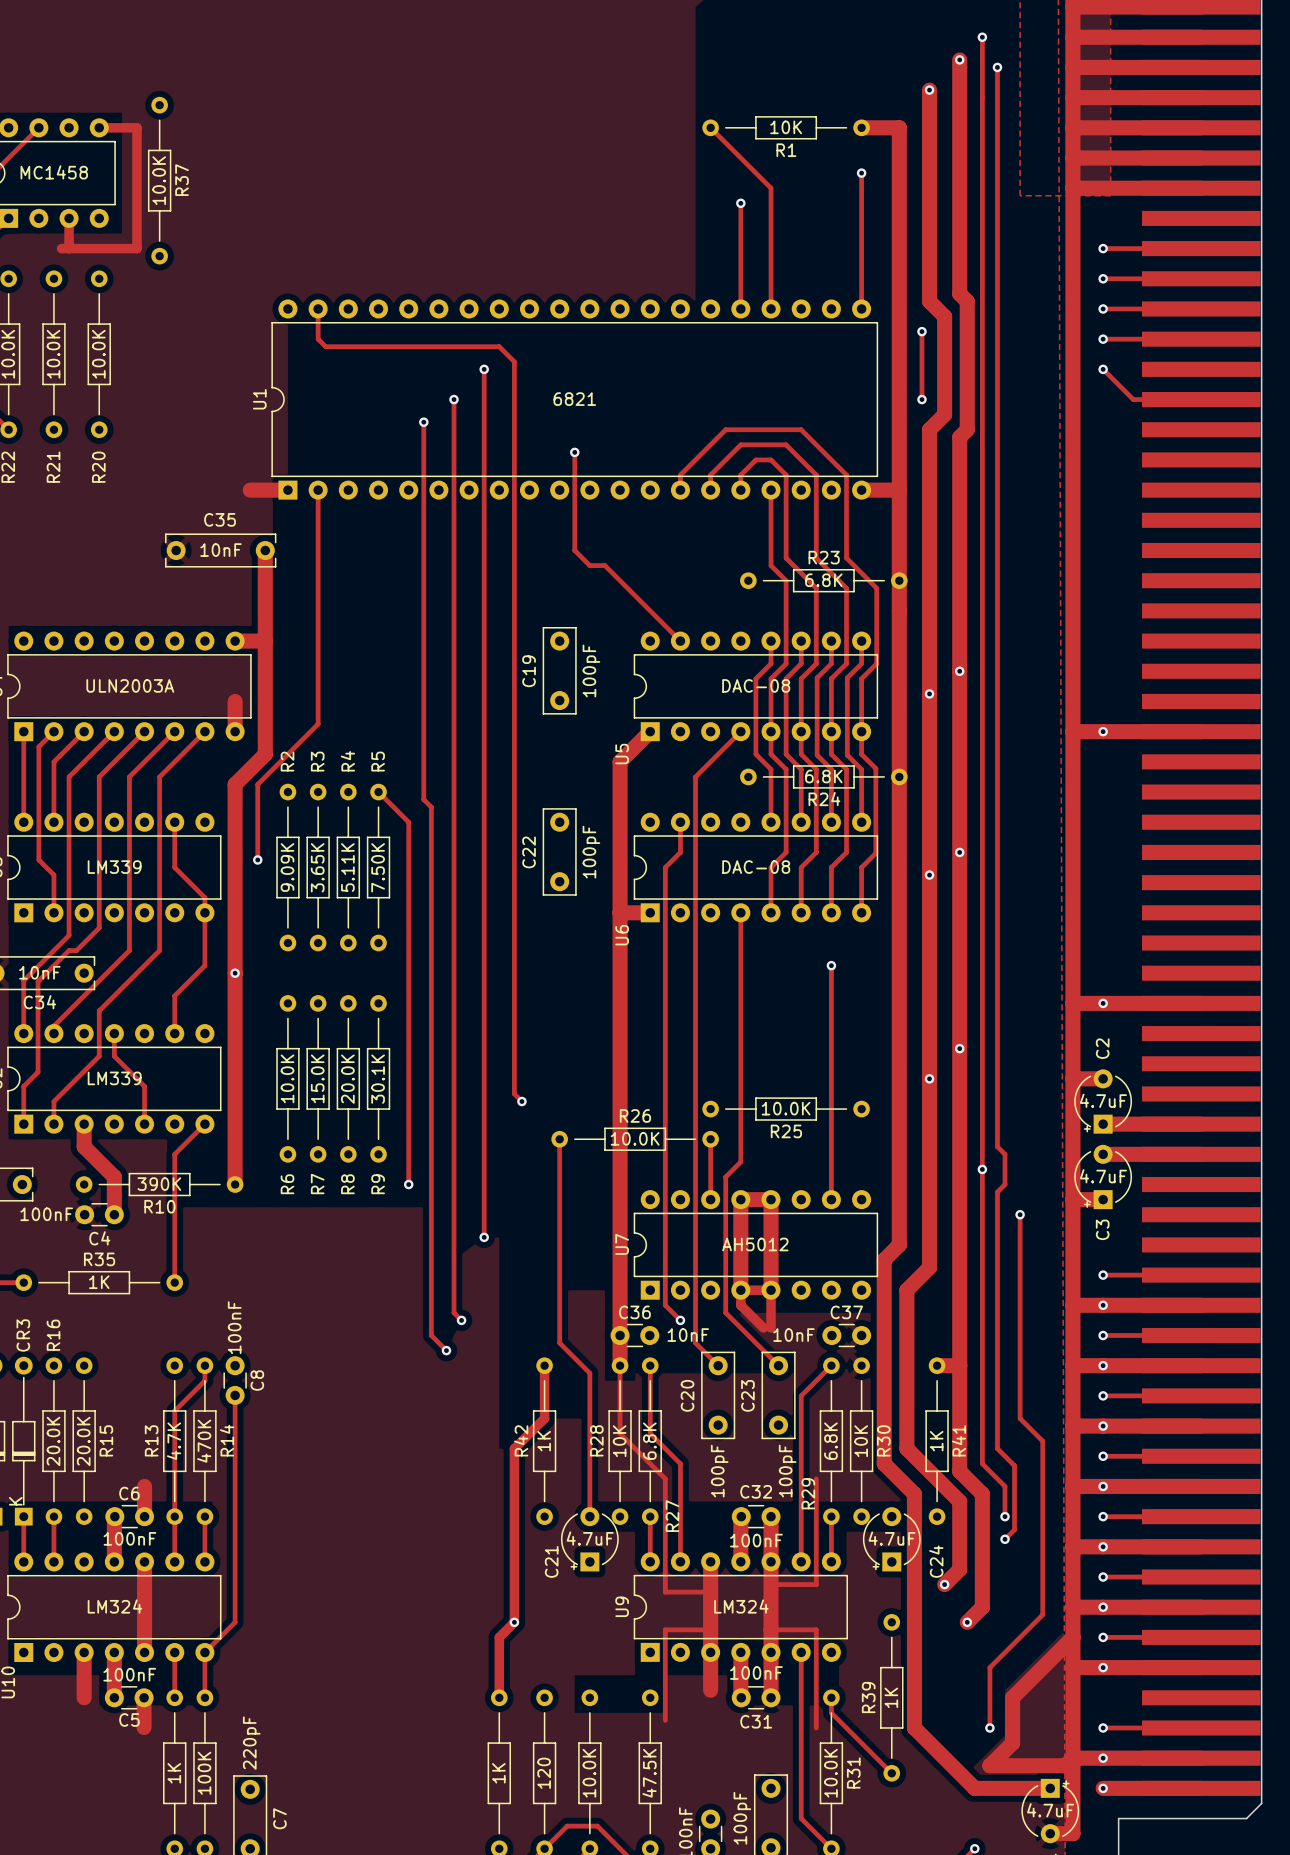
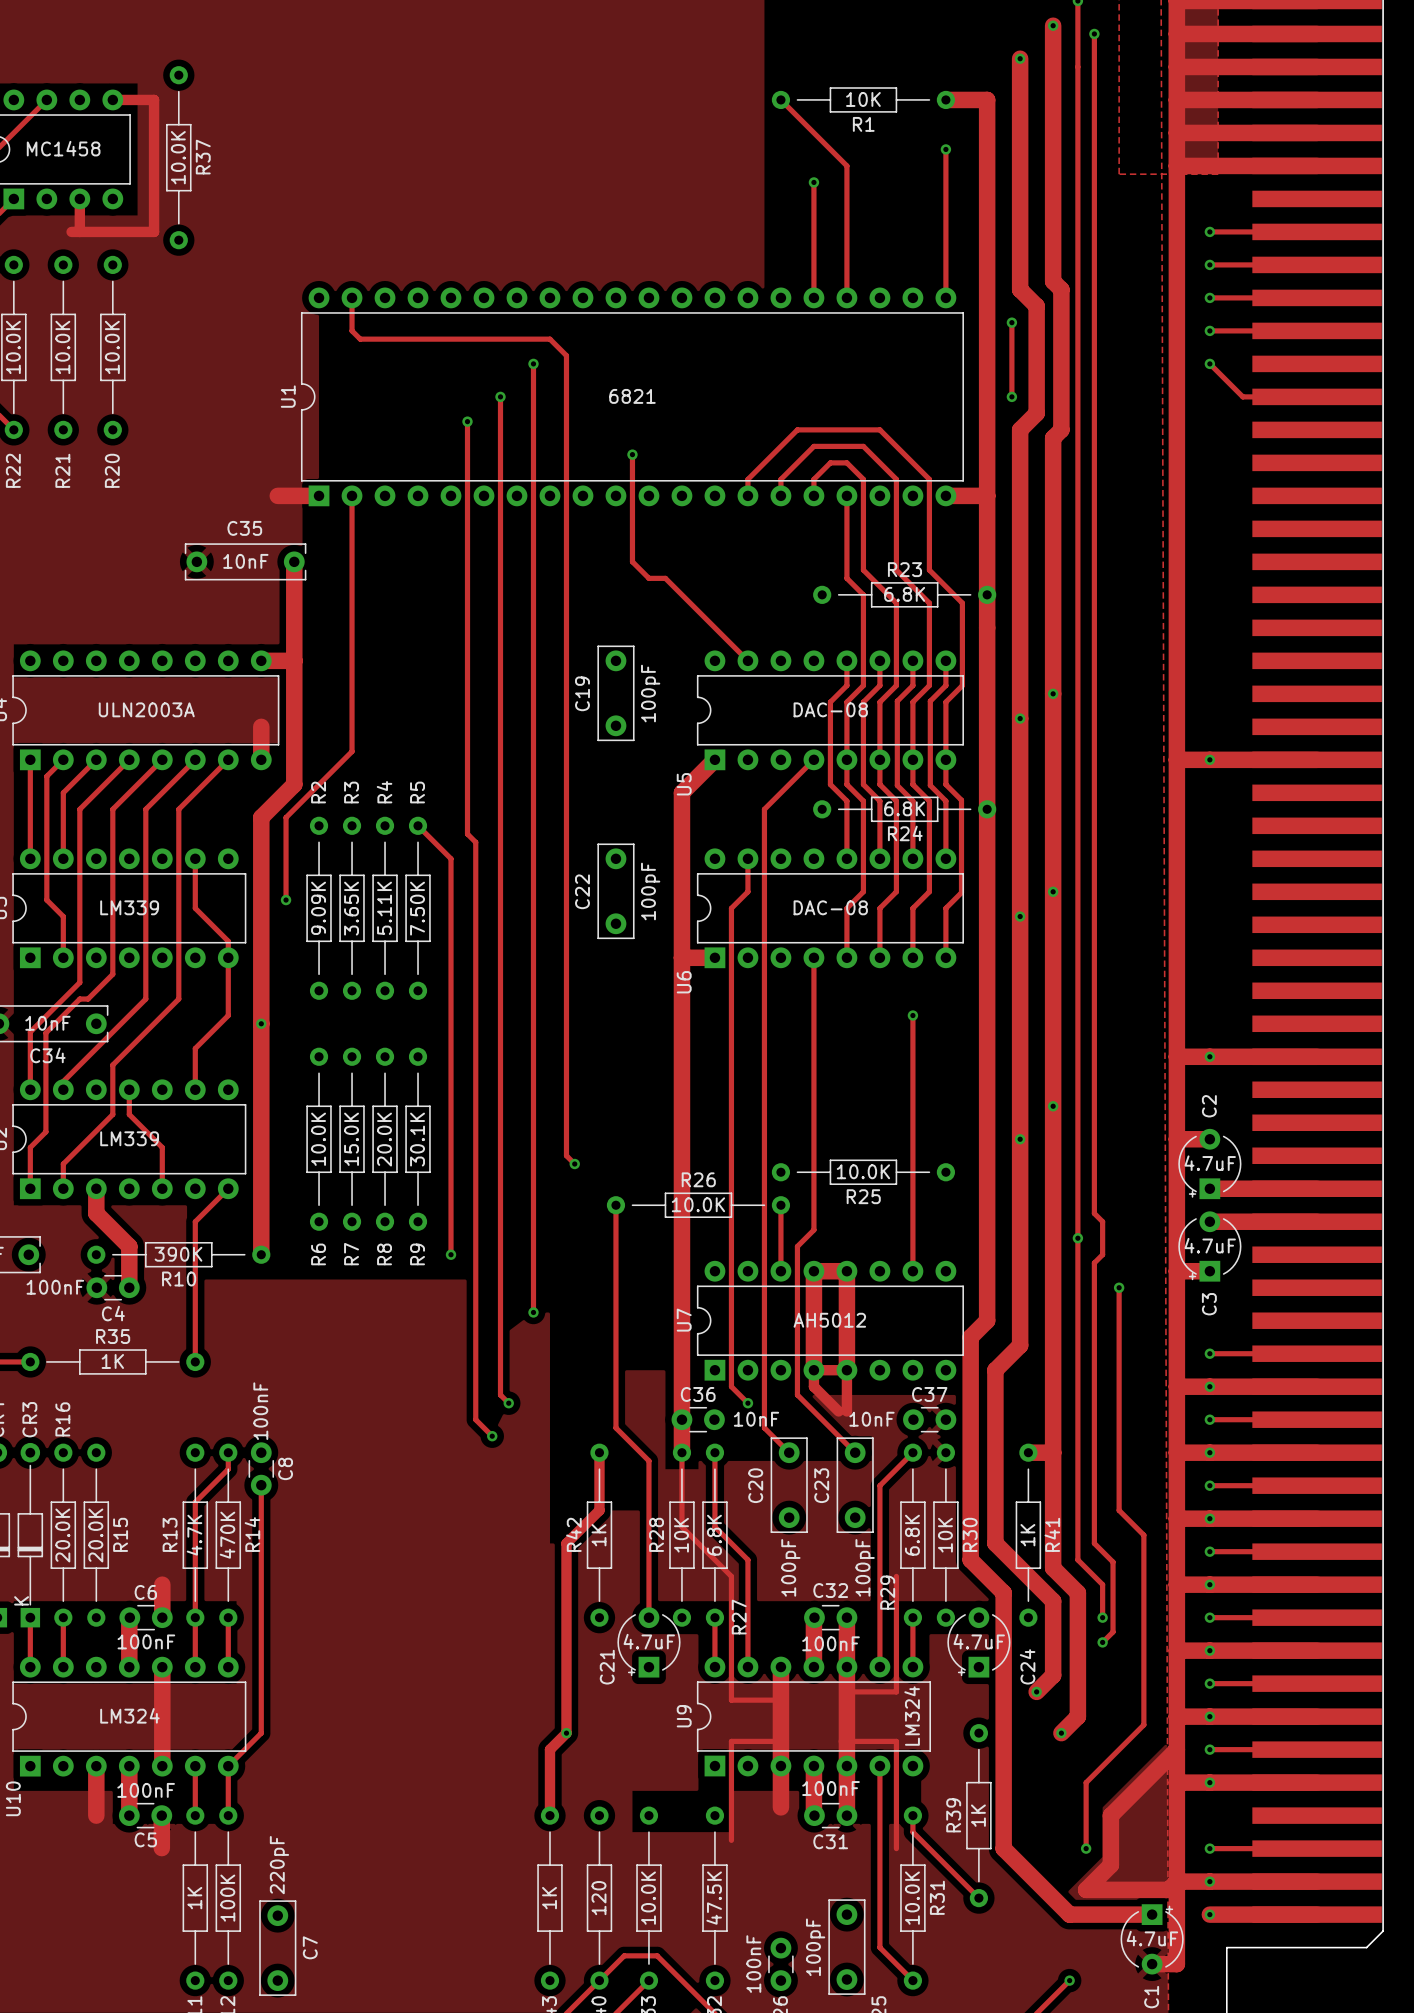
U9 value rotation: 0° (741, 1606) -> 90° counterclockwise (912, 1716)
U9 value position: LM324 (741, 1606) -> LM324 (912, 1716)

